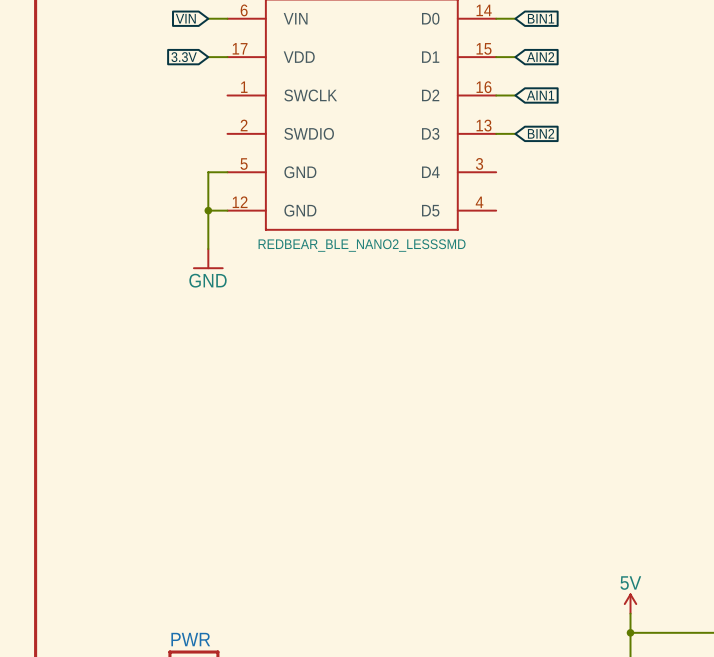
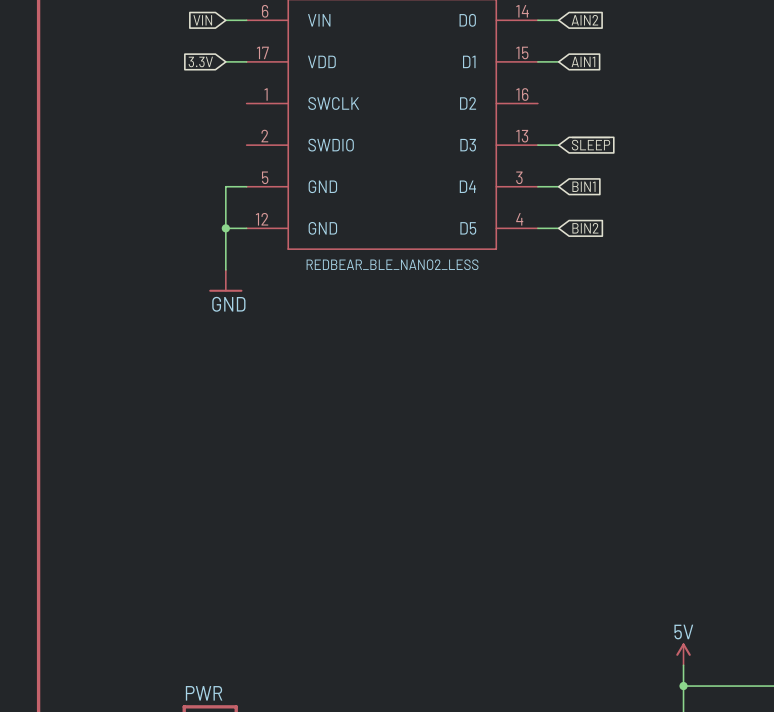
global label: BIN1 (541, 18) -> AIN2 (584, 20)
global label: AIN2 (540, 57) -> AIN1 (583, 61)
wire: (496, 95) (515, 95) -> (537, 186) (558, 186)
global label: AIN1 (540, 95) -> none
global label: BIN2 (541, 133) -> ~{SLEEP} (591, 143)
global label: none -> BIN1 (583, 186)
wire: none -> (537, 228) (558, 228)
global label: none -> BIN2 (585, 228)
part value: REDBEAR_BLE_NANO2_LESSSMD (362, 245) -> REDBEAR_BLE_NANO2_LESS (392, 264)

